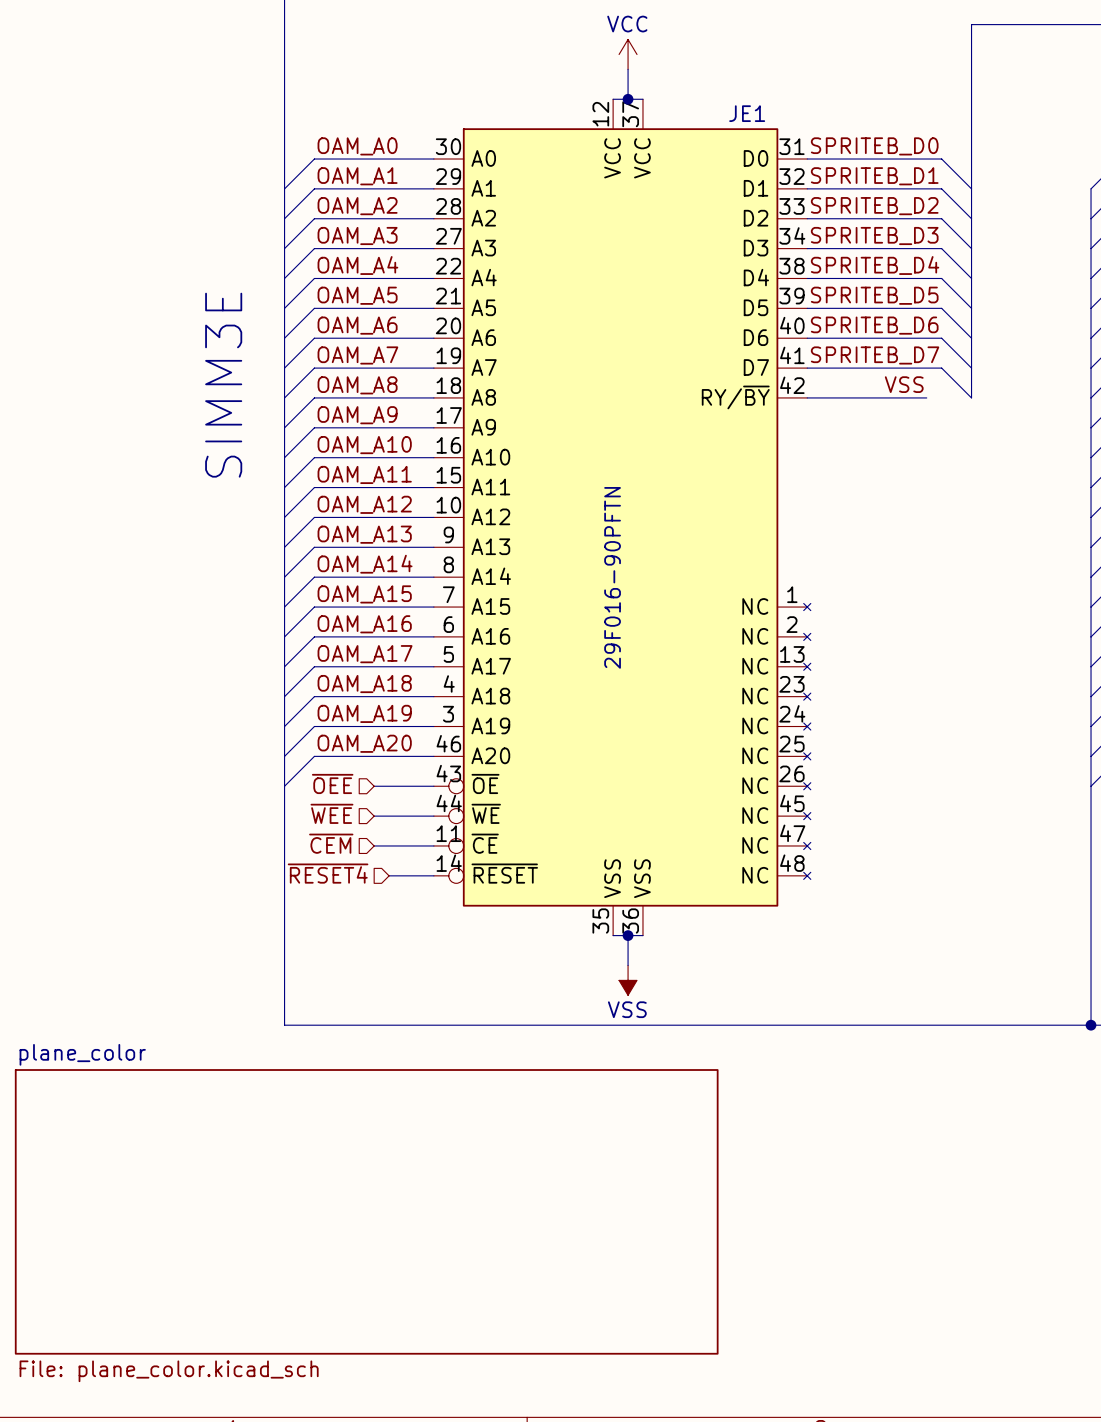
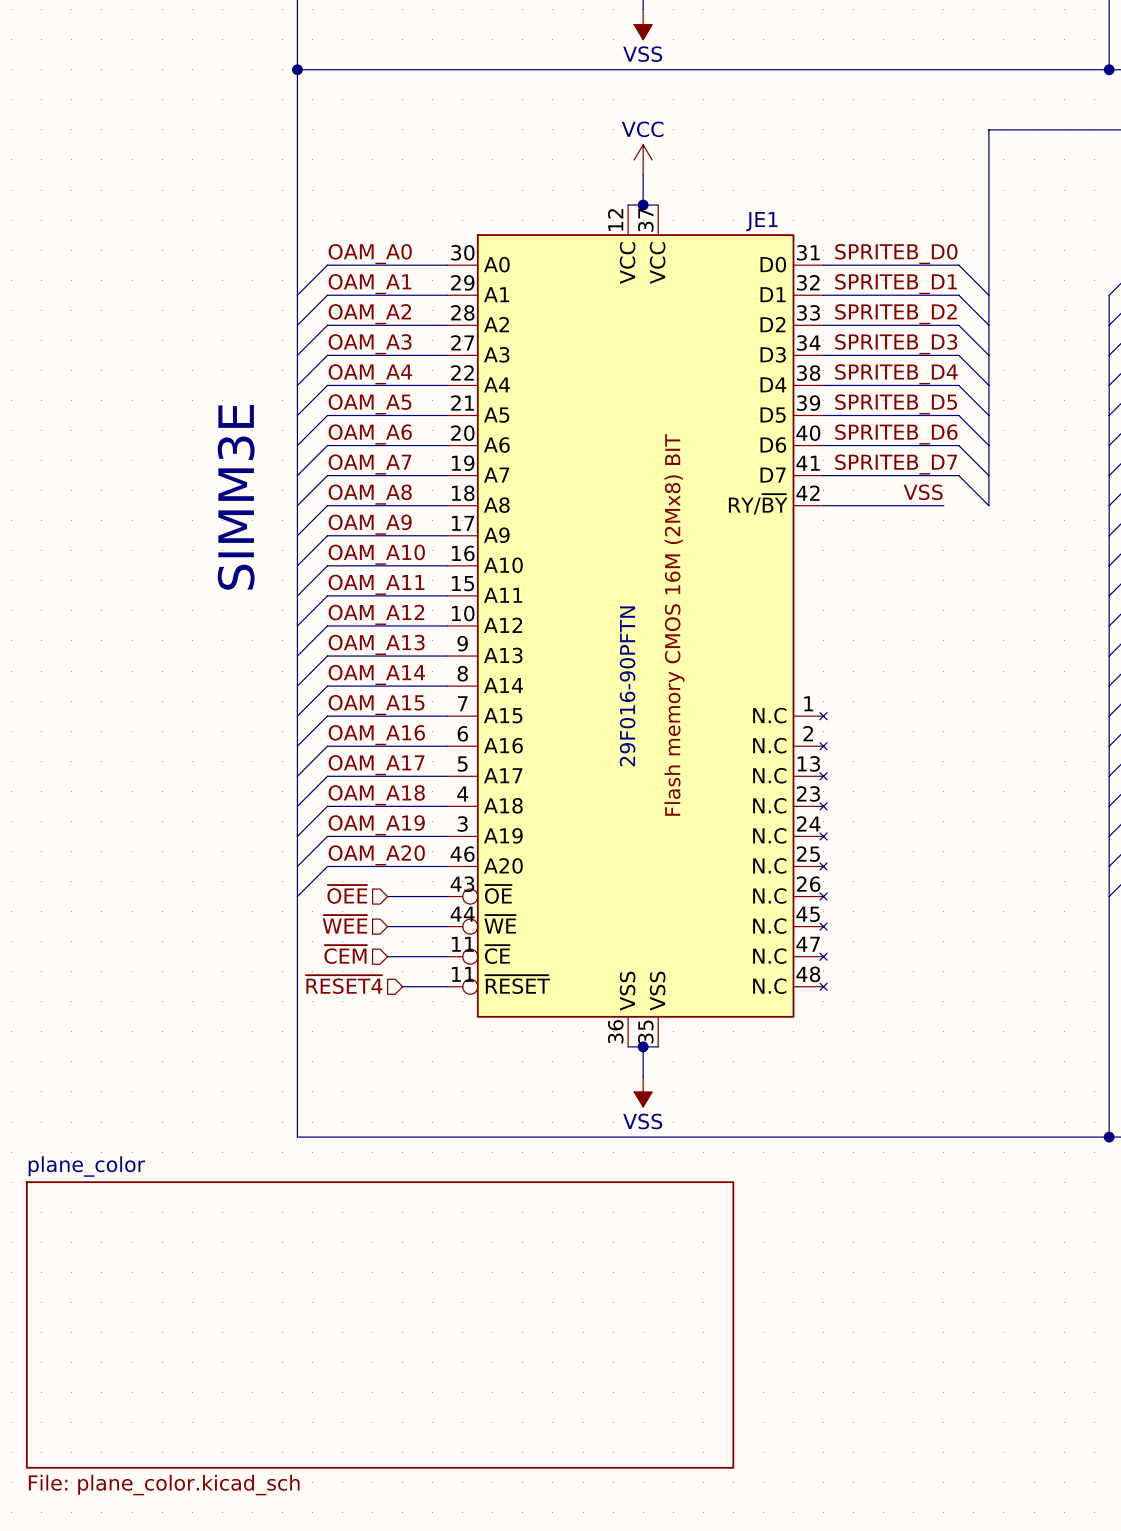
JE1 symbol: [433, 99, 811, 936] -> [447, 205, 828, 1047]

